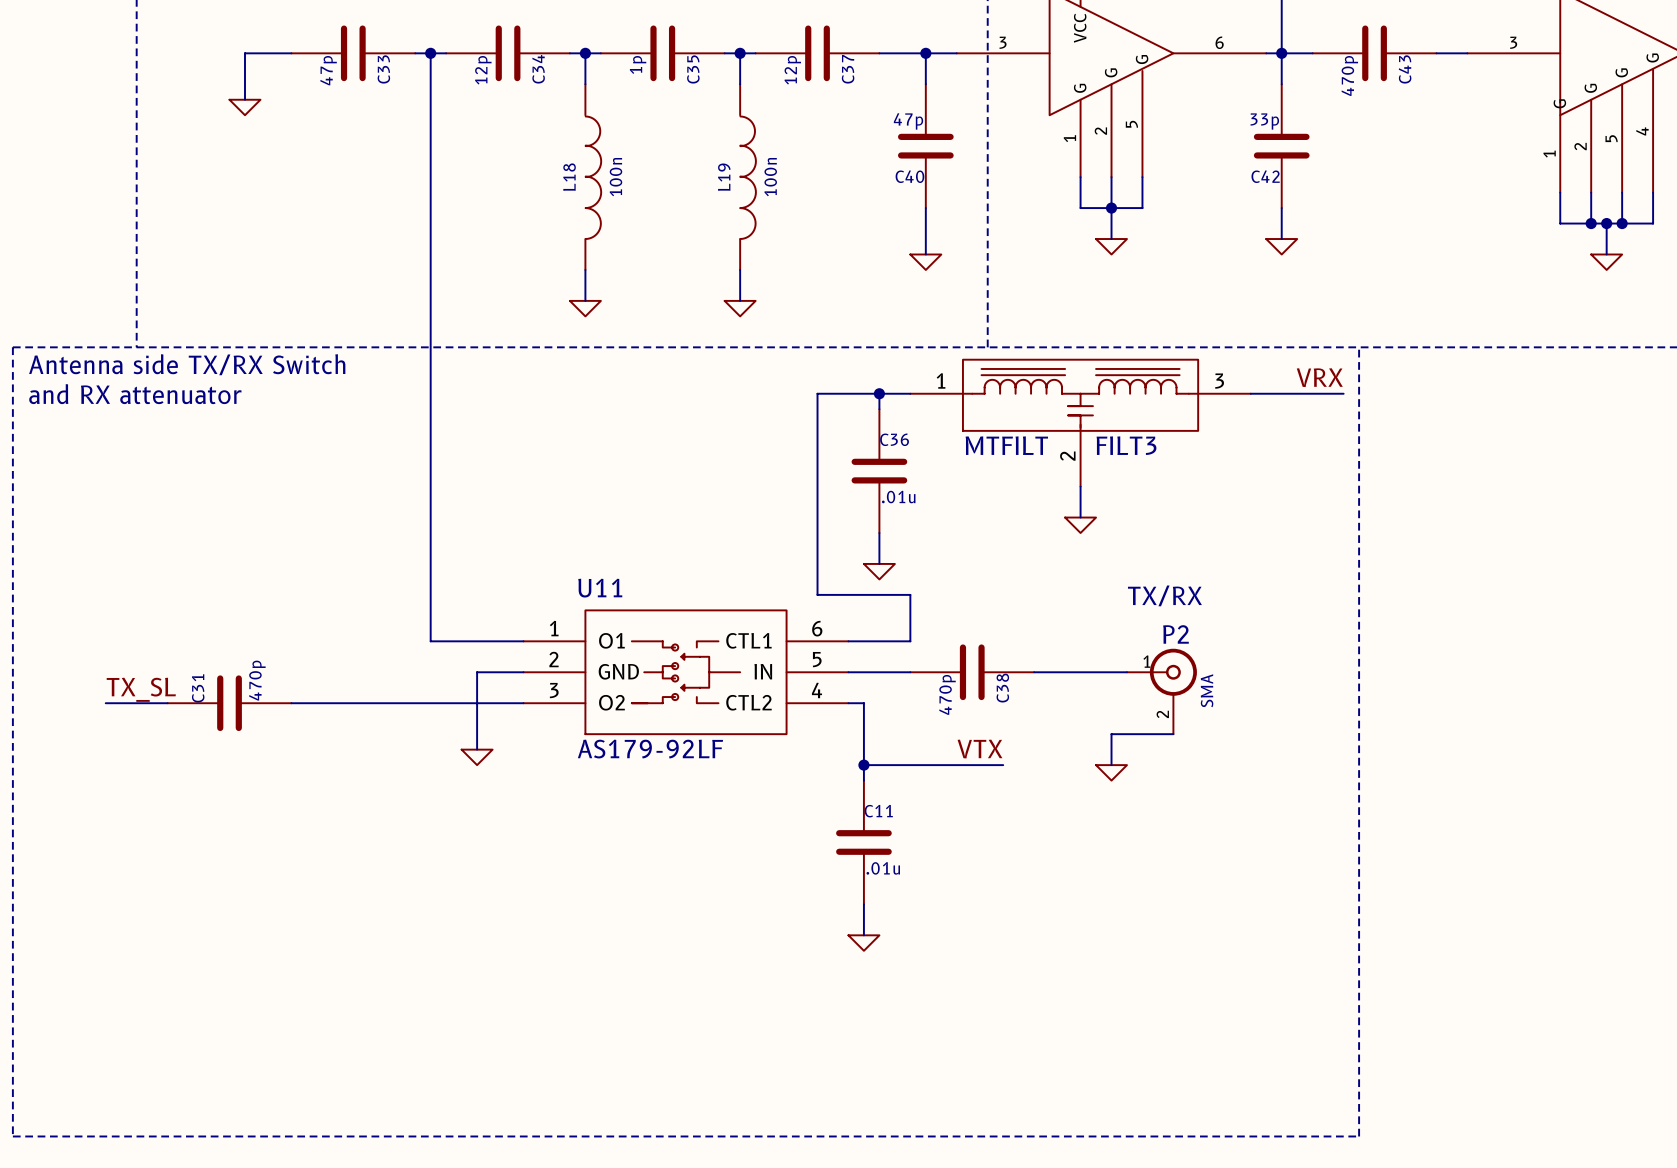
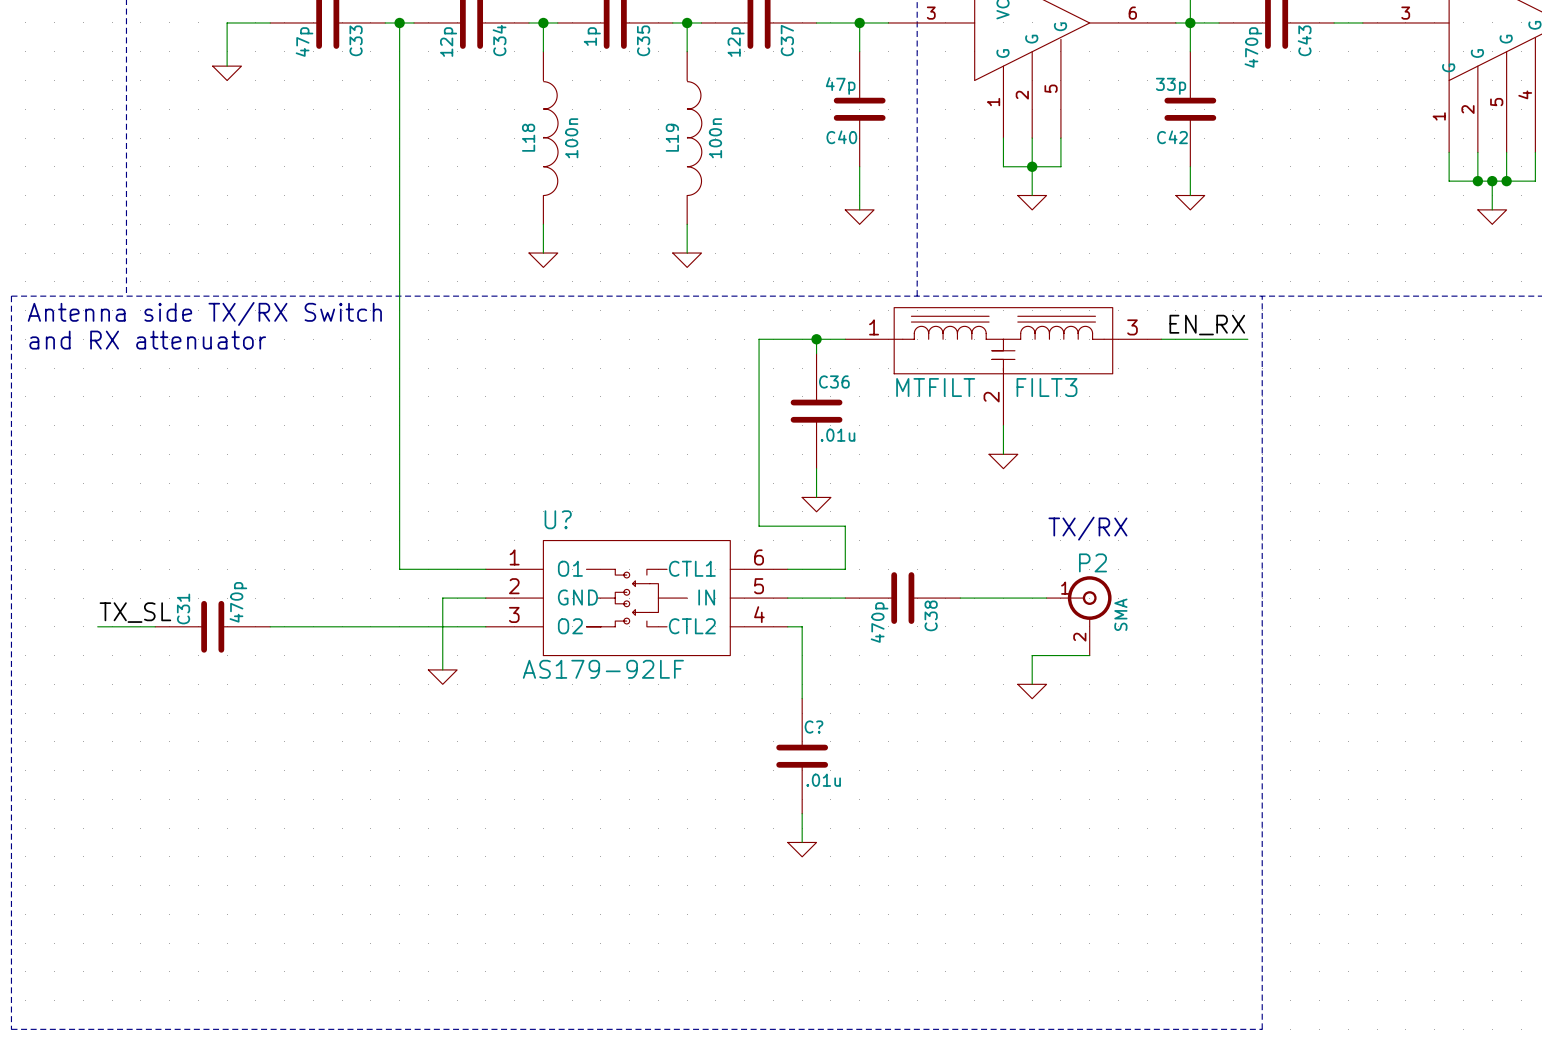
label: VRX (1319, 377) -> EN_RX (1207, 325)
U11 name: U11 (600, 588) -> U? (558, 519)
label: VTX (979, 749) -> none
wire: (863, 765) (1003, 765) -> none
junction: (863, 765) -> none
C11 name: C11 (878, 811) -> C? (813, 727)

